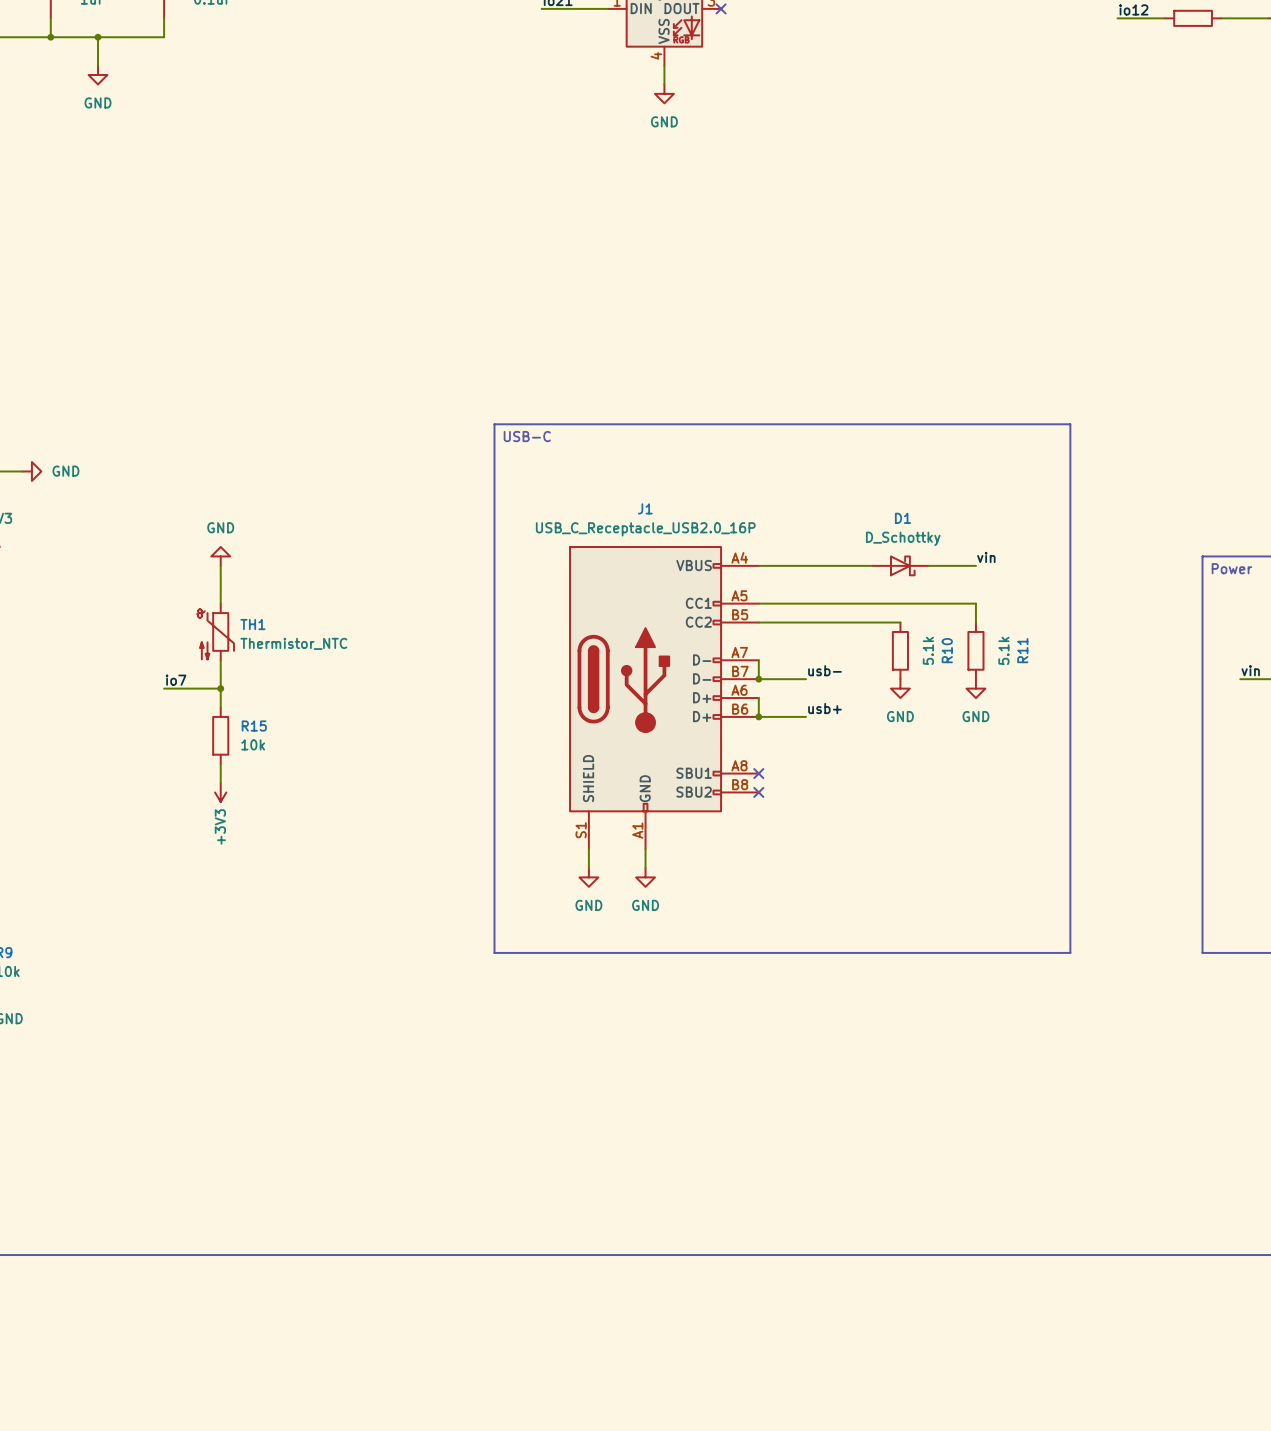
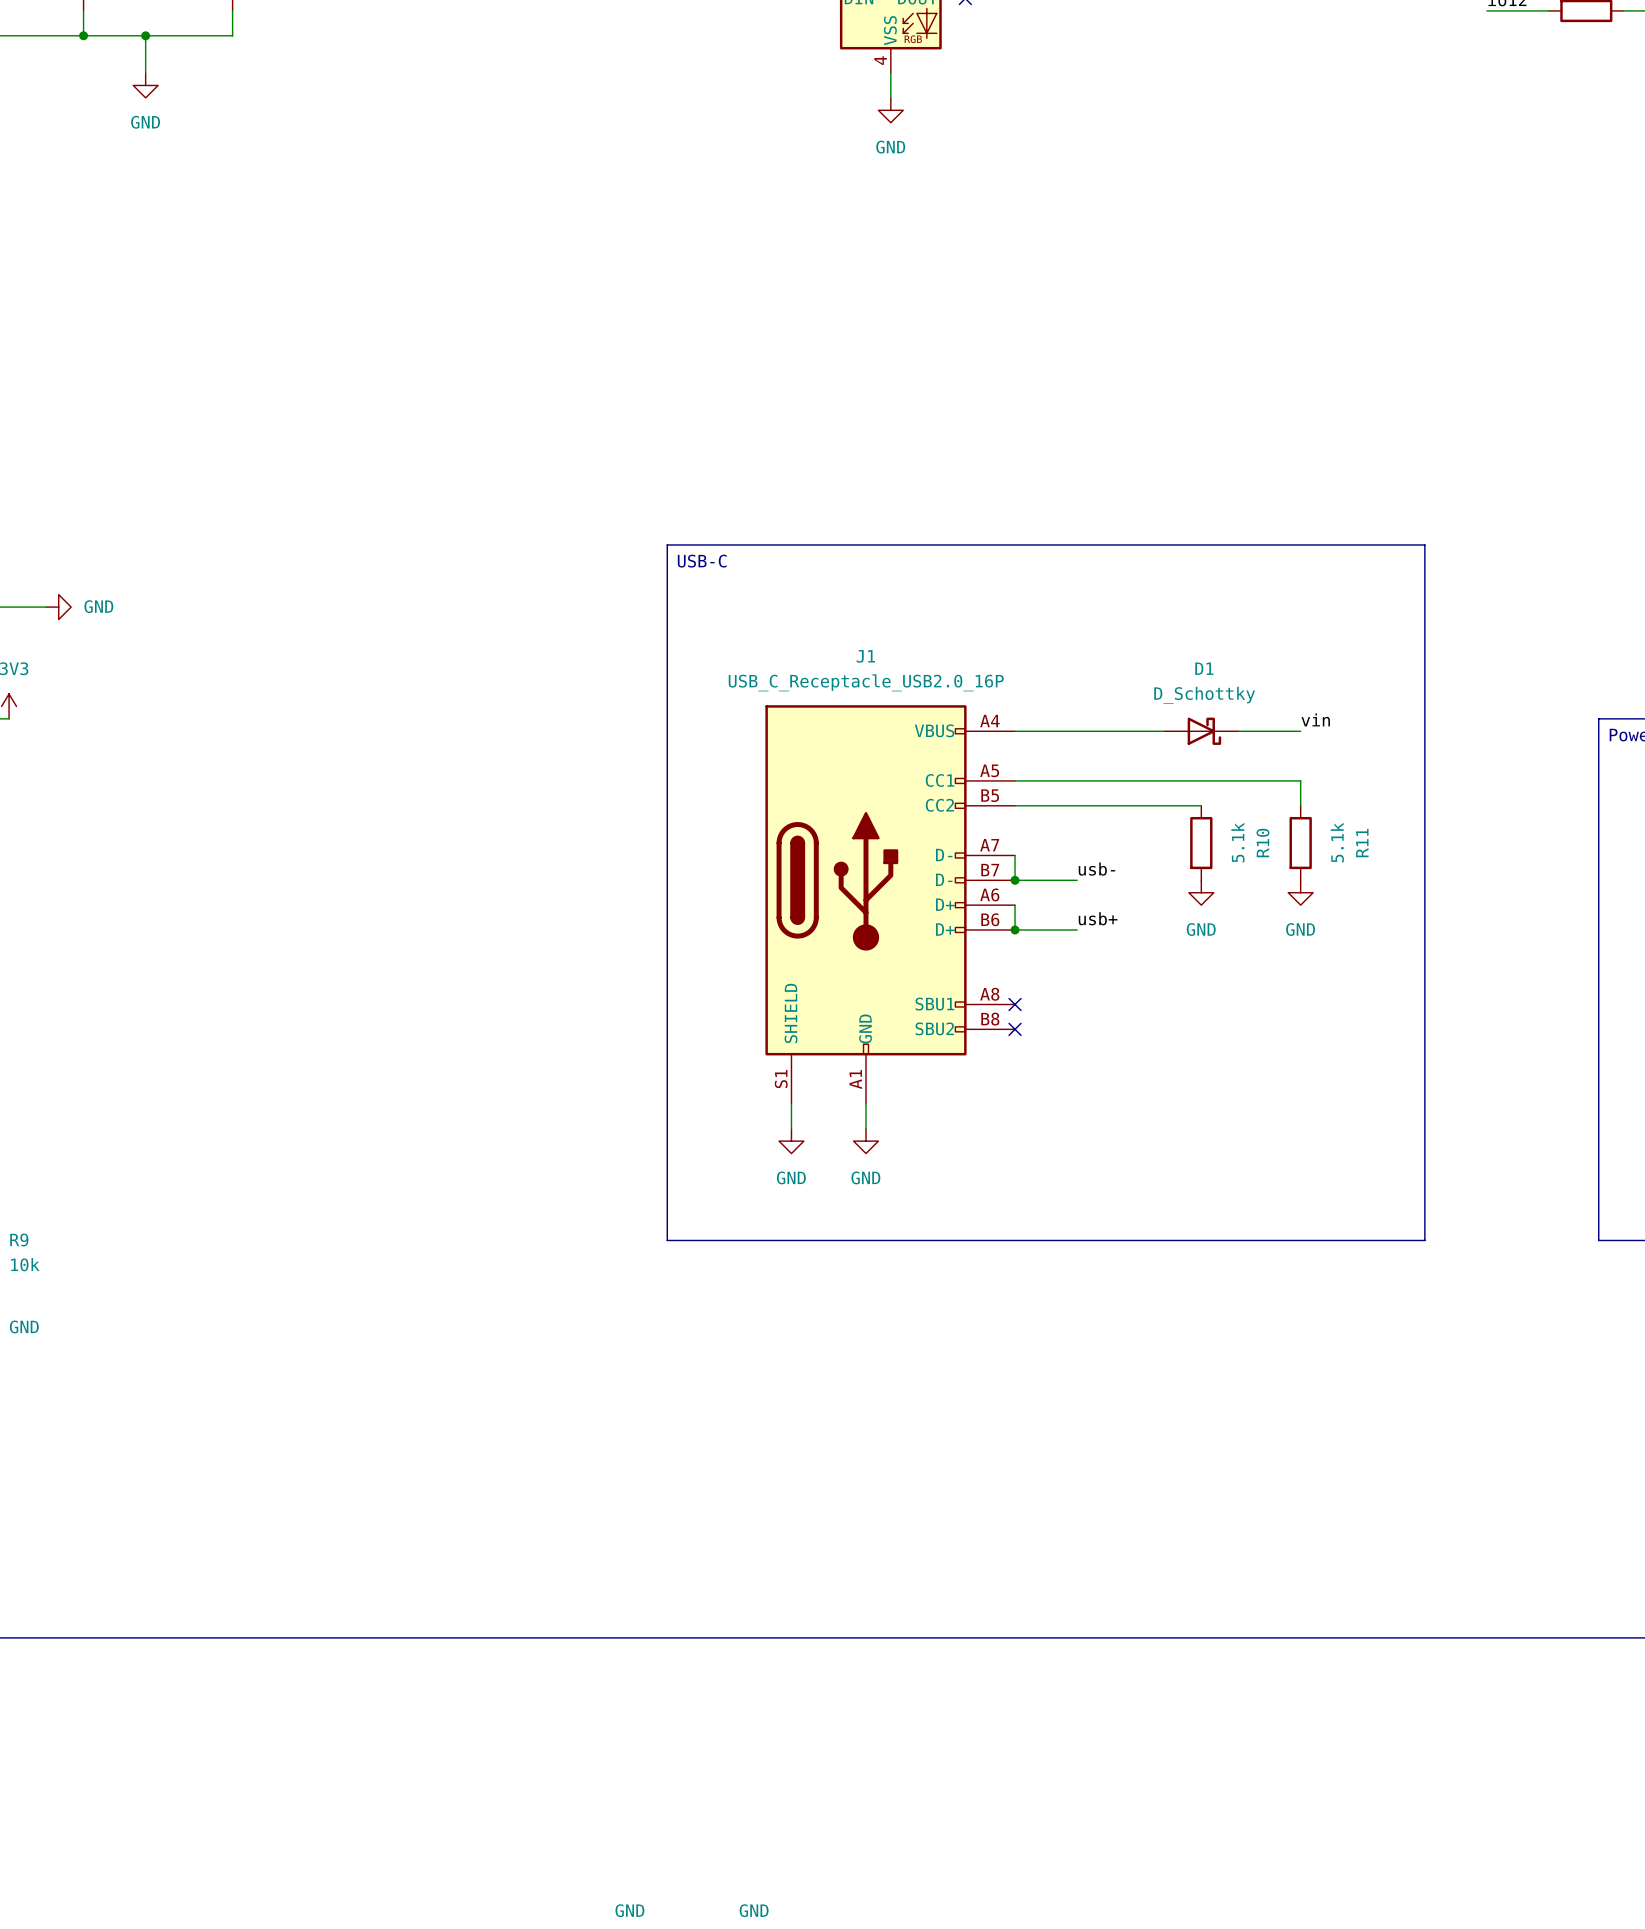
power symbol: GND (220, 556) -> none
wire: (220, 565) (220, 603) -> none
TH1: Thermistor_NTC (215, 631) -> none
wire: (220, 660) (220, 707) -> none
label: io7 (176, 680) -> none
wire: (164, 688) (220, 688) -> none
junction: (220, 688) -> none
R15: 10k (220, 735) -> none
wire: (220, 764) (220, 783) -> none
power symbol: +3V3 (220, 792) -> none

